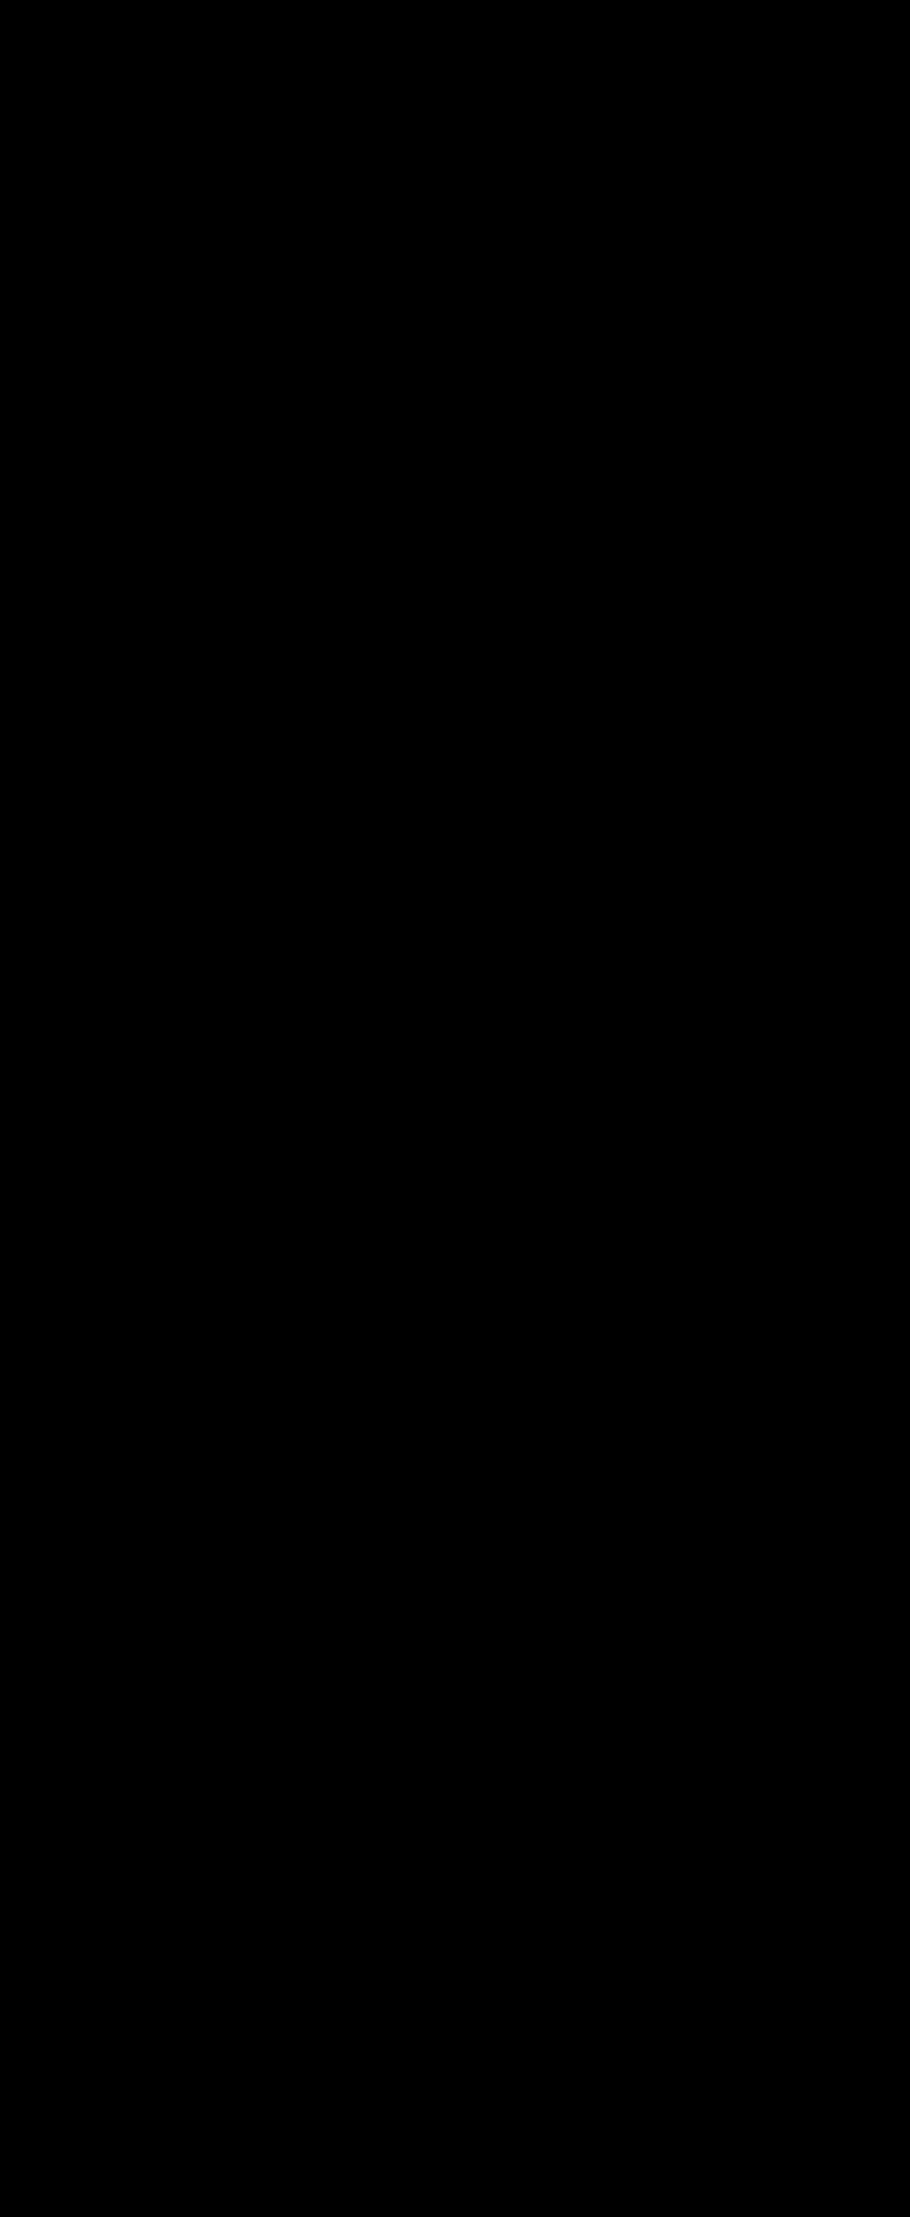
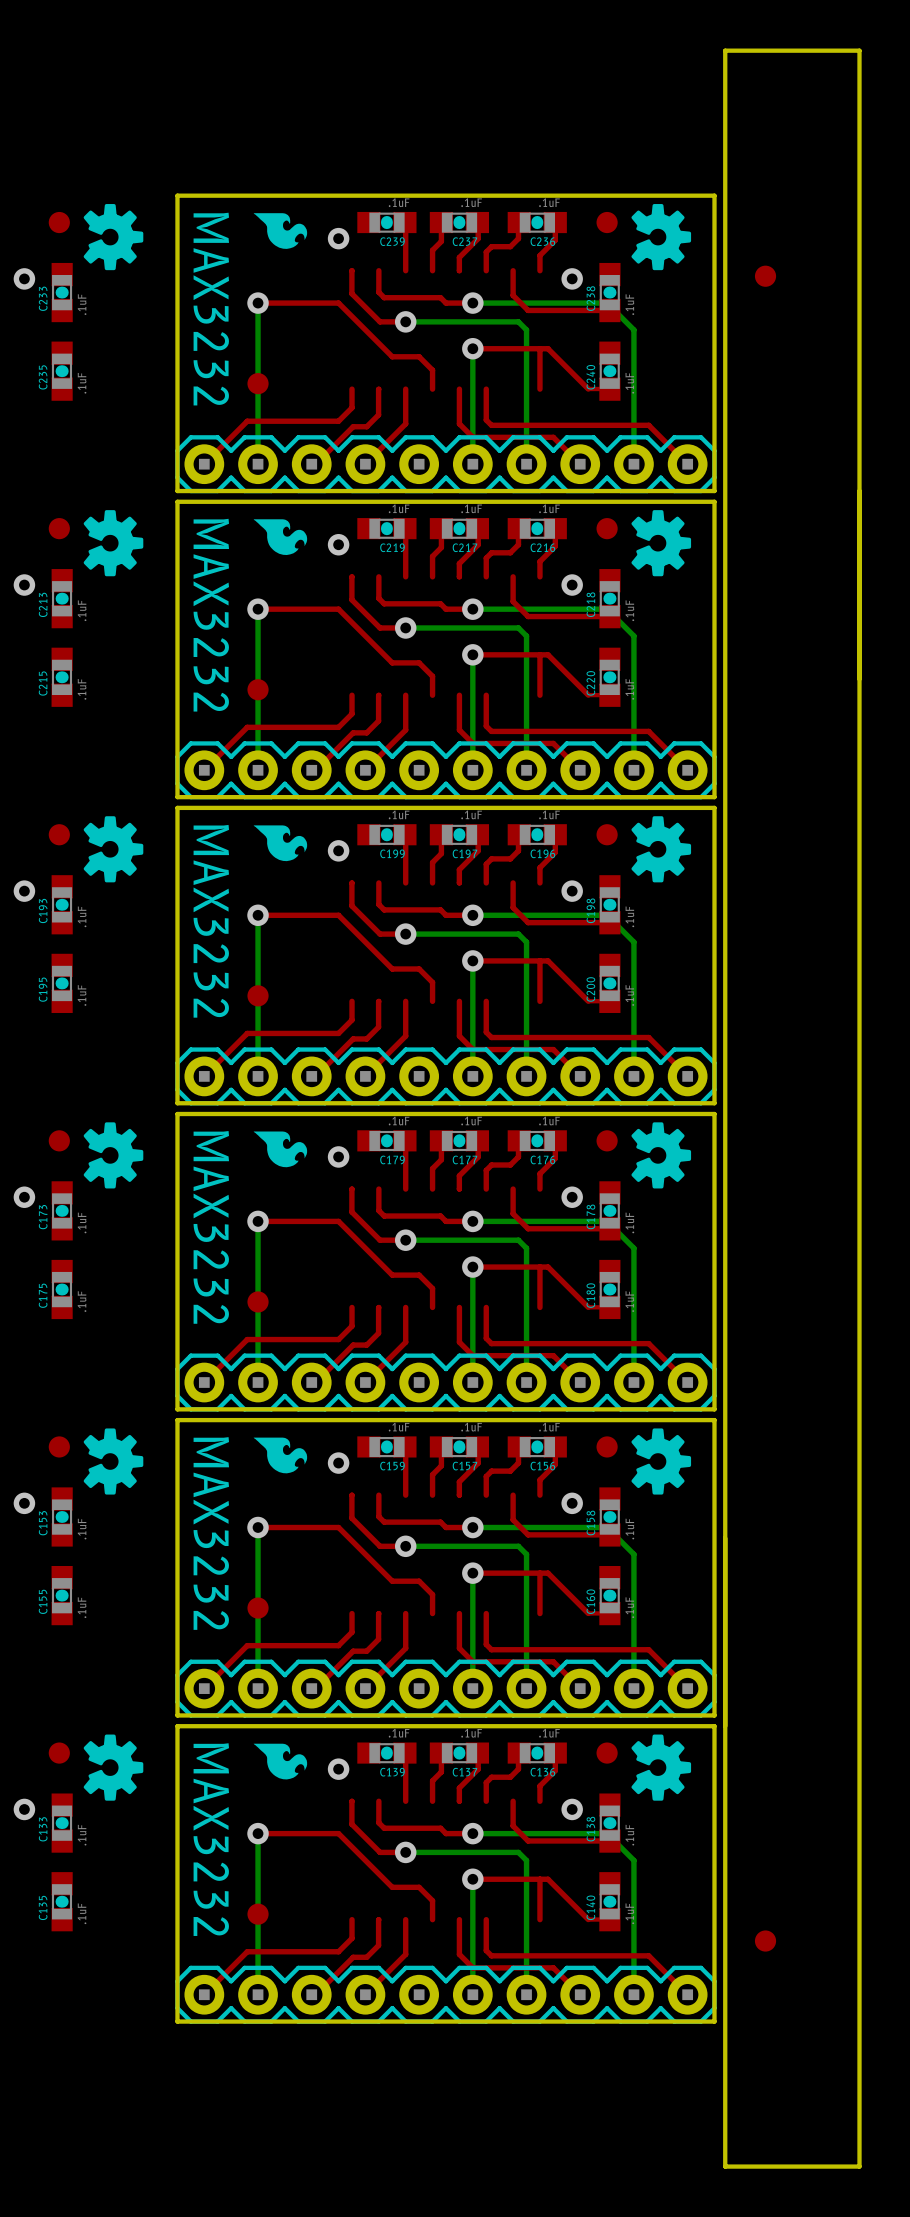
board edge: none -> (725, 50) (725, 2166) (859, 2166) (859, 50) (725, 50)
board edge: none -> (177, 195) (714, 195) (714, 491) (177, 491) (177, 195)
drawing: none -> [83, 204, 144, 271]
drawing: none -> [631, 204, 692, 271]
drawing: none -> [253, 213, 308, 249]
part: none -> (59, 222)
C239: none -> .1uF (386, 222)
top track: none -> (404, 222) (405, 270)
top track: none -> (441, 222) (441, 241) (432, 250) (432, 270)
C237: none -> .1uF (459, 222)
top track: none -> (477, 222) (478, 238) (459, 257) (459, 270)
top track: none -> (519, 222) (518, 238) (510, 246) (491, 246) (486, 252) (486, 270)
C236: none -> .1uF (537, 222)
top track: none -> (555, 222) (555, 240) (539, 255) (539, 270)
part: none -> (607, 222)
via: none -> (338, 238)
top track: none -> (351, 270) (351, 293) (380, 321) (405, 321)
top track: none -> (378, 270) (378, 292) (384, 297) (440, 297) (445, 303) (472, 303)
top track: none -> (513, 270) (513, 295) (528, 310) (609, 310)
part: none -> (765, 276)
via: none -> (24, 278)
via: none -> (572, 278)
C233: none -> .1uF (62, 292)
C238: none -> .1uF (609, 292)
top track: none -> (258, 303) (338, 303) (392, 356) (419, 356) (432, 370) (432, 389)
bottom track: none -> (258, 303) (258, 464)
via: none -> (258, 303)
bottom track: none -> (472, 303) (607, 303) (633, 329) (633, 464)
via: none -> (472, 303)
text: none -> MAX3232 (211, 309)
bottom track: none -> (405, 321) (518, 321) (526, 329) (526, 464)
via: none -> (405, 321)
top track: none -> (472, 348) (548, 348) (588, 389) (609, 389)
bottom track: none -> (472, 348) (472, 464)
via: none -> (472, 348)
top track: none -> (539, 348) (539, 389)
C235: none -> .1uF (62, 371)
C240: none -> .1uF (609, 371)
part: none -> (258, 383)
top track: none -> (352, 389) (352, 407) (338, 421) (247, 421) (204, 464)
top track: none -> (378, 389) (378, 414) (366, 426) (353, 426) (315, 464) (311, 464)
top track: none -> (405, 389) (405, 423) (365, 464)
top track: none -> (459, 389) (459, 423) (472, 437) (553, 437) (580, 464)
top track: none -> (486, 389) (486, 420) (491, 425) (648, 425) (687, 464)
part: none -> (445, 464)
board edge: none -> (177, 501) (714, 501) (714, 797) (177, 797) (177, 501)
drawing: none -> [83, 510, 144, 577]
drawing: none -> [631, 510, 692, 577]
drawing: none -> [253, 519, 308, 556]
part: none -> (59, 528)
C219: none -> .1uF (386, 528)
top track: none -> (404, 528) (405, 576)
top track: none -> (441, 528) (441, 547) (432, 556) (432, 576)
C217: none -> .1uF (459, 528)
top track: none -> (477, 528) (478, 544) (459, 563) (459, 576)
top track: none -> (519, 528) (518, 544) (510, 552) (491, 552) (486, 558) (486, 576)
C216: none -> .1uF (537, 528)
top track: none -> (555, 528) (555, 546) (539, 561) (539, 576)
part: none -> (607, 528)
via: none -> (338, 544)
top track: none -> (351, 576) (351, 599) (380, 627) (405, 627)
top track: none -> (378, 576) (378, 598) (384, 603) (440, 603) (445, 609) (472, 609)
top track: none -> (513, 576) (513, 601) (528, 616) (609, 616)
via: none -> (24, 585)
via: none -> (572, 585)
C213: none -> .1uF (62, 598)
C218: none -> .1uF (609, 598)
top track: none -> (258, 609) (338, 609) (392, 662) (419, 662) (432, 676) (432, 695)
bottom track: none -> (258, 609) (258, 770)
via: none -> (258, 609)
bottom track: none -> (472, 609) (607, 609) (633, 636) (633, 770)
via: none -> (472, 609)
text: none -> MAX3232 (211, 615)
bottom track: none -> (405, 627) (518, 627) (526, 636) (526, 770)
via: none -> (405, 627)
top track: none -> (472, 654) (548, 654) (588, 695) (609, 695)
bottom track: none -> (472, 654) (472, 770)
via: none -> (472, 654)
top track: none -> (539, 654) (539, 695)
C215: none -> .1uF (62, 677)
C220: none -> .1uF (609, 677)
part: none -> (258, 689)
top track: none -> (352, 695) (352, 713) (338, 727) (247, 727) (204, 770)
top track: none -> (378, 695) (378, 721) (366, 732) (353, 732) (315, 770) (311, 770)
top track: none -> (405, 695) (405, 730) (365, 770)
top track: none -> (459, 695) (459, 730) (472, 743) (553, 743) (580, 770)
top track: none -> (486, 695) (486, 726) (491, 731) (648, 731) (687, 770)
part: none -> (445, 770)
board edge: none -> (177, 807) (714, 807) (714, 1103) (177, 1103) (177, 807)
drawing: none -> [83, 816, 144, 883]
drawing: none -> [631, 816, 692, 883]
drawing: none -> [253, 825, 308, 862]
part: none -> (59, 834)
C199: none -> .1uF (386, 834)
top track: none -> (404, 834) (405, 882)
top track: none -> (441, 834) (441, 853) (432, 862) (432, 882)
C197: none -> .1uF (459, 834)
top track: none -> (477, 834) (478, 850) (459, 869) (459, 882)
top track: none -> (519, 834) (518, 850) (510, 858) (491, 858) (486, 864) (486, 882)
C196: none -> .1uF (537, 834)
top track: none -> (555, 834) (555, 852) (539, 867) (539, 882)
part: none -> (607, 834)
via: none -> (338, 850)
top track: none -> (378, 882) (378, 904) (384, 909) (440, 909) (445, 915) (472, 915)
top track: none -> (513, 882) (513, 907) (528, 922) (609, 922)
top track: none -> (351, 883) (351, 905) (380, 934) (405, 934)
via: none -> (24, 891)
via: none -> (572, 891)
C193: none -> .1uF (62, 904)
C198: none -> .1uF (609, 904)
top track: none -> (258, 915) (338, 915) (392, 969) (419, 969) (432, 982) (432, 1001)
bottom track: none -> (258, 915) (258, 1076)
via: none -> (258, 915)
bottom track: none -> (472, 915) (607, 915) (633, 942) (633, 1076)
via: none -> (472, 915)
text: none -> MAX3232 (211, 921)
bottom track: none -> (405, 934) (518, 934) (526, 942) (526, 1076)
via: none -> (405, 934)
top track: none -> (472, 960) (548, 960) (588, 1001) (609, 1001)
bottom track: none -> (472, 960) (472, 1076)
via: none -> (472, 960)
top track: none -> (539, 960) (539, 1001)
C195: none -> .1uF (62, 983)
C200: none -> .1uF (609, 983)
part: none -> (258, 995)
top track: none -> (352, 1001) (352, 1020) (338, 1033) (247, 1033) (204, 1076)
top track: none -> (378, 1001) (378, 1027) (366, 1038) (353, 1038) (315, 1076) (311, 1076)
top track: none -> (405, 1001) (405, 1036) (365, 1076)
top track: none -> (459, 1001) (459, 1036) (472, 1049) (553, 1049) (580, 1076)
top track: none -> (486, 1001) (486, 1032) (491, 1037) (648, 1037) (687, 1076)
part: none -> (445, 1076)
board edge: none -> (177, 1113) (714, 1113) (714, 1409) (177, 1409) (177, 1113)
drawing: none -> [83, 1122, 144, 1189]
drawing: none -> [631, 1122, 692, 1189]
drawing: none -> [253, 1131, 308, 1168]
part: none -> (59, 1140)
C179: none -> .1uF (386, 1140)
top track: none -> (404, 1140) (405, 1189)
top track: none -> (441, 1140) (441, 1159) (432, 1168) (432, 1189)
C177: none -> .1uF (459, 1140)
top track: none -> (477, 1140) (478, 1156) (459, 1175) (459, 1189)
top track: none -> (519, 1140) (518, 1156) (510, 1165) (491, 1165) (486, 1170) (486, 1189)
C176: none -> .1uF (537, 1140)
top track: none -> (555, 1140) (555, 1158) (539, 1173) (539, 1189)
part: none -> (607, 1140)
via: none -> (338, 1156)
top track: none -> (351, 1189) (351, 1212) (380, 1240) (405, 1240)
top track: none -> (378, 1189) (378, 1210) (384, 1216) (440, 1216) (445, 1221) (472, 1221)
top track: none -> (513, 1189) (513, 1213) (528, 1228) (609, 1228)
via: none -> (24, 1197)
via: none -> (572, 1197)
C173: none -> .1uF (62, 1210)
C178: none -> .1uF (609, 1210)
top track: none -> (258, 1221) (338, 1221) (392, 1275) (419, 1275) (432, 1288) (432, 1307)
bottom track: none -> (258, 1221) (258, 1382)
via: none -> (258, 1221)
bottom track: none -> (472, 1221) (607, 1221) (633, 1248) (633, 1382)
via: none -> (472, 1221)
text: none -> MAX3232 (211, 1227)
bottom track: none -> (405, 1240) (518, 1240) (526, 1248) (526, 1382)
via: none -> (405, 1240)
top track: none -> (472, 1267) (548, 1267) (588, 1307) (609, 1307)
bottom track: none -> (472, 1267) (472, 1382)
via: none -> (472, 1267)
top track: none -> (539, 1267) (539, 1307)
C175: none -> .1uF (62, 1289)
C180: none -> .1uF (609, 1289)
part: none -> (258, 1301)
top track: none -> (352, 1307) (352, 1326) (338, 1339) (247, 1339) (204, 1382)
top track: none -> (378, 1307) (378, 1333) (366, 1345) (353, 1345) (315, 1382) (311, 1382)
top track: none -> (405, 1307) (405, 1342) (365, 1382)
top track: none -> (459, 1307) (459, 1342) (472, 1355) (553, 1355) (580, 1382)
top track: none -> (486, 1307) (486, 1338) (491, 1343) (648, 1343) (687, 1382)
part: none -> (445, 1382)
board edge: none -> (177, 1420) (714, 1420) (714, 1715) (177, 1715) (177, 1420)
drawing: none -> [83, 1428, 144, 1495]
drawing: none -> [631, 1428, 692, 1495]
drawing: none -> [253, 1437, 308, 1474]
part: none -> (59, 1446)
C159: none -> .1uF (386, 1446)
top track: none -> (404, 1446) (405, 1495)
top track: none -> (441, 1446) (441, 1465) (432, 1474) (432, 1495)
C157: none -> .1uF (459, 1446)
top track: none -> (477, 1446) (478, 1463) (459, 1481) (459, 1495)
top track: none -> (519, 1446) (518, 1463) (510, 1471) (491, 1471) (486, 1476) (486, 1495)
C156: none -> .1uF (537, 1446)
part: none -> (607, 1446)
top track: none -> (555, 1447) (555, 1464) (539, 1479) (539, 1495)
via: none -> (338, 1463)
top track: none -> (351, 1495) (351, 1518) (380, 1546) (405, 1546)
top track: none -> (378, 1495) (378, 1516) (384, 1522) (440, 1522) (445, 1527) (472, 1527)
top track: none -> (513, 1495) (513, 1519) (528, 1534) (609, 1534)
via: none -> (24, 1503)
via: none -> (572, 1503)
C153: none -> .1uF (62, 1516)
C158: none -> .1uF (609, 1516)
top track: none -> (258, 1527) (338, 1527) (392, 1581) (419, 1581) (432, 1594) (432, 1613)
bottom track: none -> (258, 1527) (258, 1688)
via: none -> (258, 1527)
bottom track: none -> (472, 1527) (607, 1527) (633, 1554) (633, 1688)
via: none -> (472, 1527)
text: none -> MAX3232 (211, 1533)
bottom track: none -> (405, 1546) (518, 1546) (526, 1554) (526, 1688)
via: none -> (405, 1546)
top track: none -> (472, 1573) (548, 1573) (588, 1613) (609, 1613)
bottom track: none -> (472, 1573) (472, 1688)
via: none -> (472, 1573)
top track: none -> (539, 1573) (539, 1613)
C155: none -> .1uF (62, 1595)
C160: none -> .1uF (609, 1595)
part: none -> (258, 1608)
top track: none -> (352, 1613) (352, 1632) (338, 1645) (247, 1645) (204, 1688)
top track: none -> (378, 1613) (378, 1639) (366, 1651) (353, 1651) (315, 1688) (311, 1688)
top track: none -> (405, 1613) (405, 1648) (365, 1688)
top track: none -> (459, 1613) (459, 1648) (472, 1661) (553, 1661) (580, 1688)
top track: none -> (486, 1613) (486, 1644) (491, 1649) (648, 1649) (687, 1688)
part: none -> (445, 1688)
board edge: none -> (177, 1726) (714, 1726) (714, 2021) (177, 2021) (177, 1726)
drawing: none -> [83, 1734, 144, 1801]
drawing: none -> [631, 1734, 692, 1801]
drawing: none -> [253, 1743, 308, 1780]
part: none -> (59, 1753)
C139: none -> .1uF (386, 1753)
top track: none -> (404, 1753) (405, 1801)
top track: none -> (441, 1753) (441, 1771) (432, 1780) (432, 1801)
C137: none -> .1uF (459, 1753)
top track: none -> (477, 1753) (478, 1769) (459, 1788) (459, 1801)
top track: none -> (519, 1753) (518, 1769) (510, 1777) (491, 1777) (486, 1782) (486, 1801)
C136: none -> .1uF (537, 1753)
top track: none -> (555, 1753) (555, 1770) (539, 1786) (539, 1801)
part: none -> (607, 1753)
via: none -> (338, 1769)
top track: none -> (351, 1801) (351, 1824) (380, 1852) (405, 1852)
top track: none -> (378, 1801) (378, 1822) (384, 1828) (440, 1828) (445, 1833) (472, 1833)
top track: none -> (513, 1801) (513, 1825) (528, 1840) (609, 1840)
via: none -> (24, 1809)
via: none -> (572, 1809)
C133: none -> .1uF (62, 1823)
C138: none -> .1uF (609, 1823)
top track: none -> (258, 1833) (338, 1833) (392, 1887) (419, 1887) (432, 1900) (432, 1919)
bottom track: none -> (258, 1833) (258, 1994)
via: none -> (258, 1833)
bottom track: none -> (472, 1833) (607, 1833) (633, 1860) (633, 1994)
via: none -> (472, 1833)
text: none -> MAX3232 (211, 1839)
bottom track: none -> (405, 1852) (518, 1852) (526, 1860) (526, 1994)
via: none -> (405, 1852)
top track: none -> (472, 1879) (548, 1879) (588, 1919) (609, 1919)
bottom track: none -> (472, 1879) (472, 1994)
via: none -> (472, 1879)
top track: none -> (539, 1879) (539, 1919)
C135: none -> .1uF (62, 1901)
C140: none -> .1uF (609, 1901)
part: none -> (258, 1914)
top track: none -> (352, 1919) (352, 1938) (338, 1951) (247, 1951) (204, 1994)
top track: none -> (378, 1919) (378, 1945) (366, 1957) (353, 1957) (315, 1994) (311, 1994)
top track: none -> (405, 1919) (405, 1954) (365, 1994)
top track: none -> (459, 1919) (459, 1954) (472, 1967) (553, 1967) (580, 1994)
top track: none -> (486, 1919) (486, 1950) (491, 1955) (648, 1955) (687, 1994)
part: none -> (765, 1941)
part: none -> (445, 1994)

